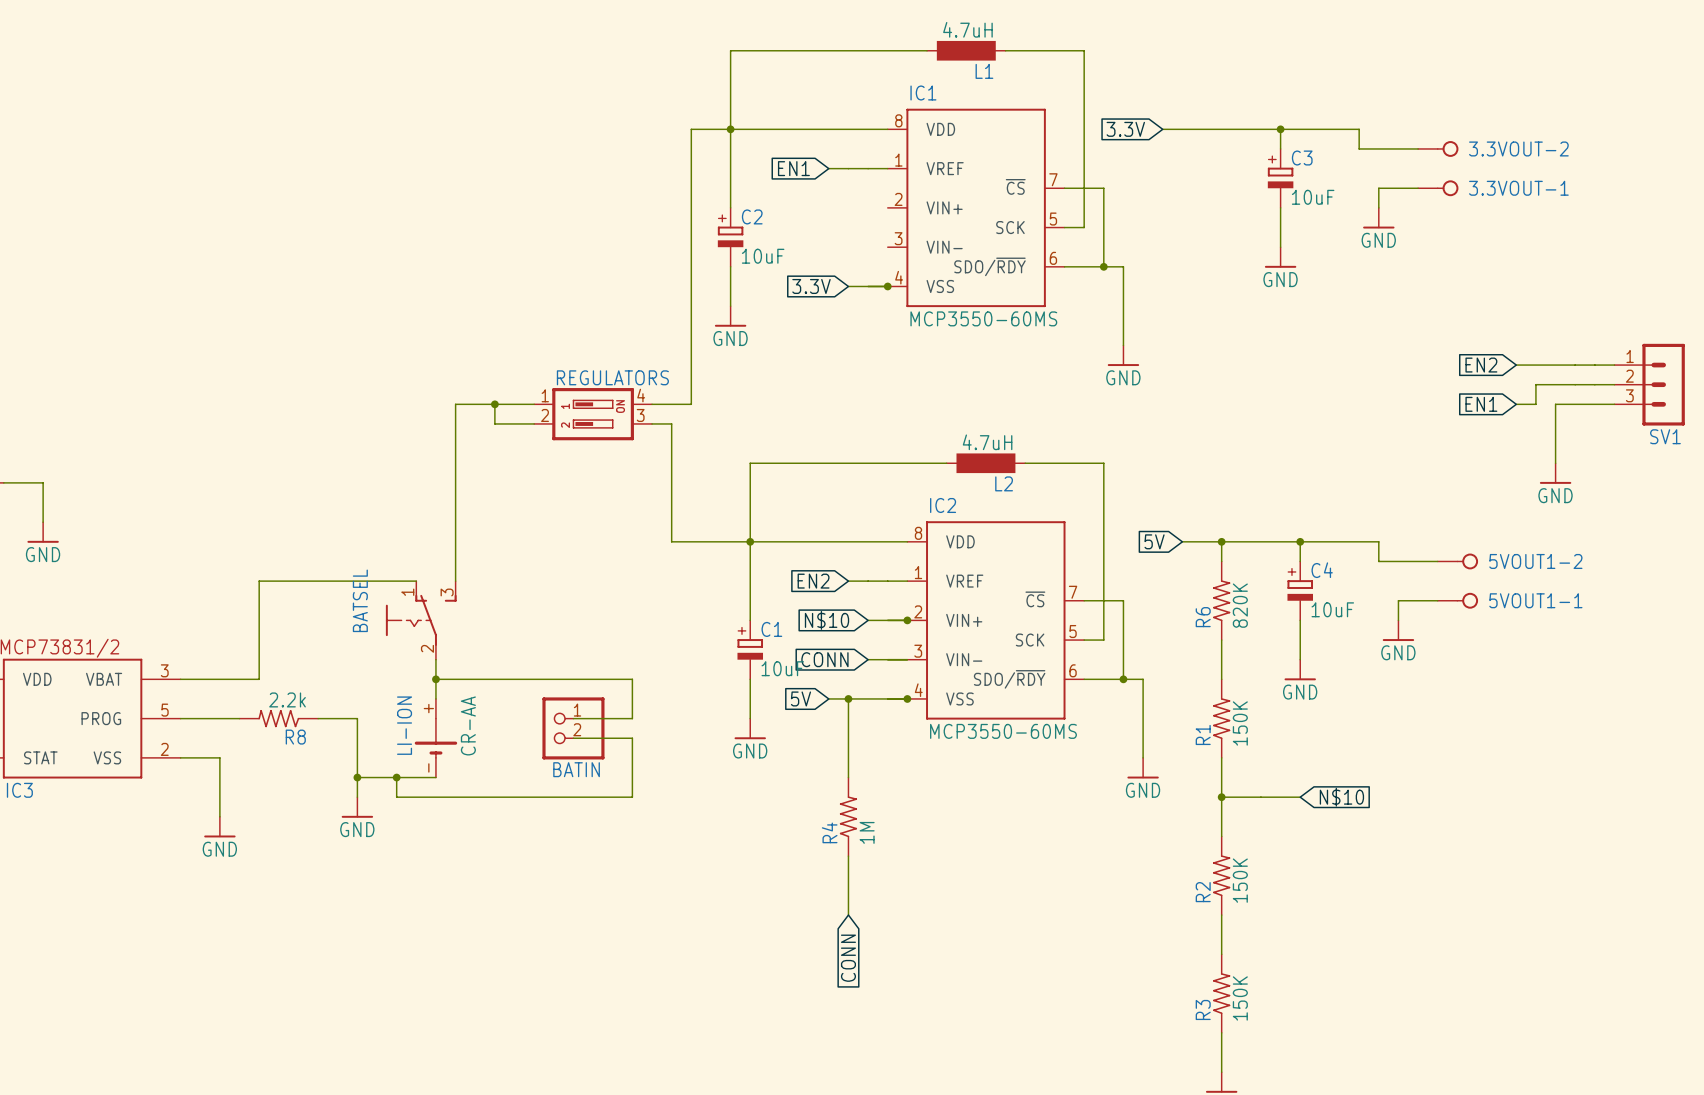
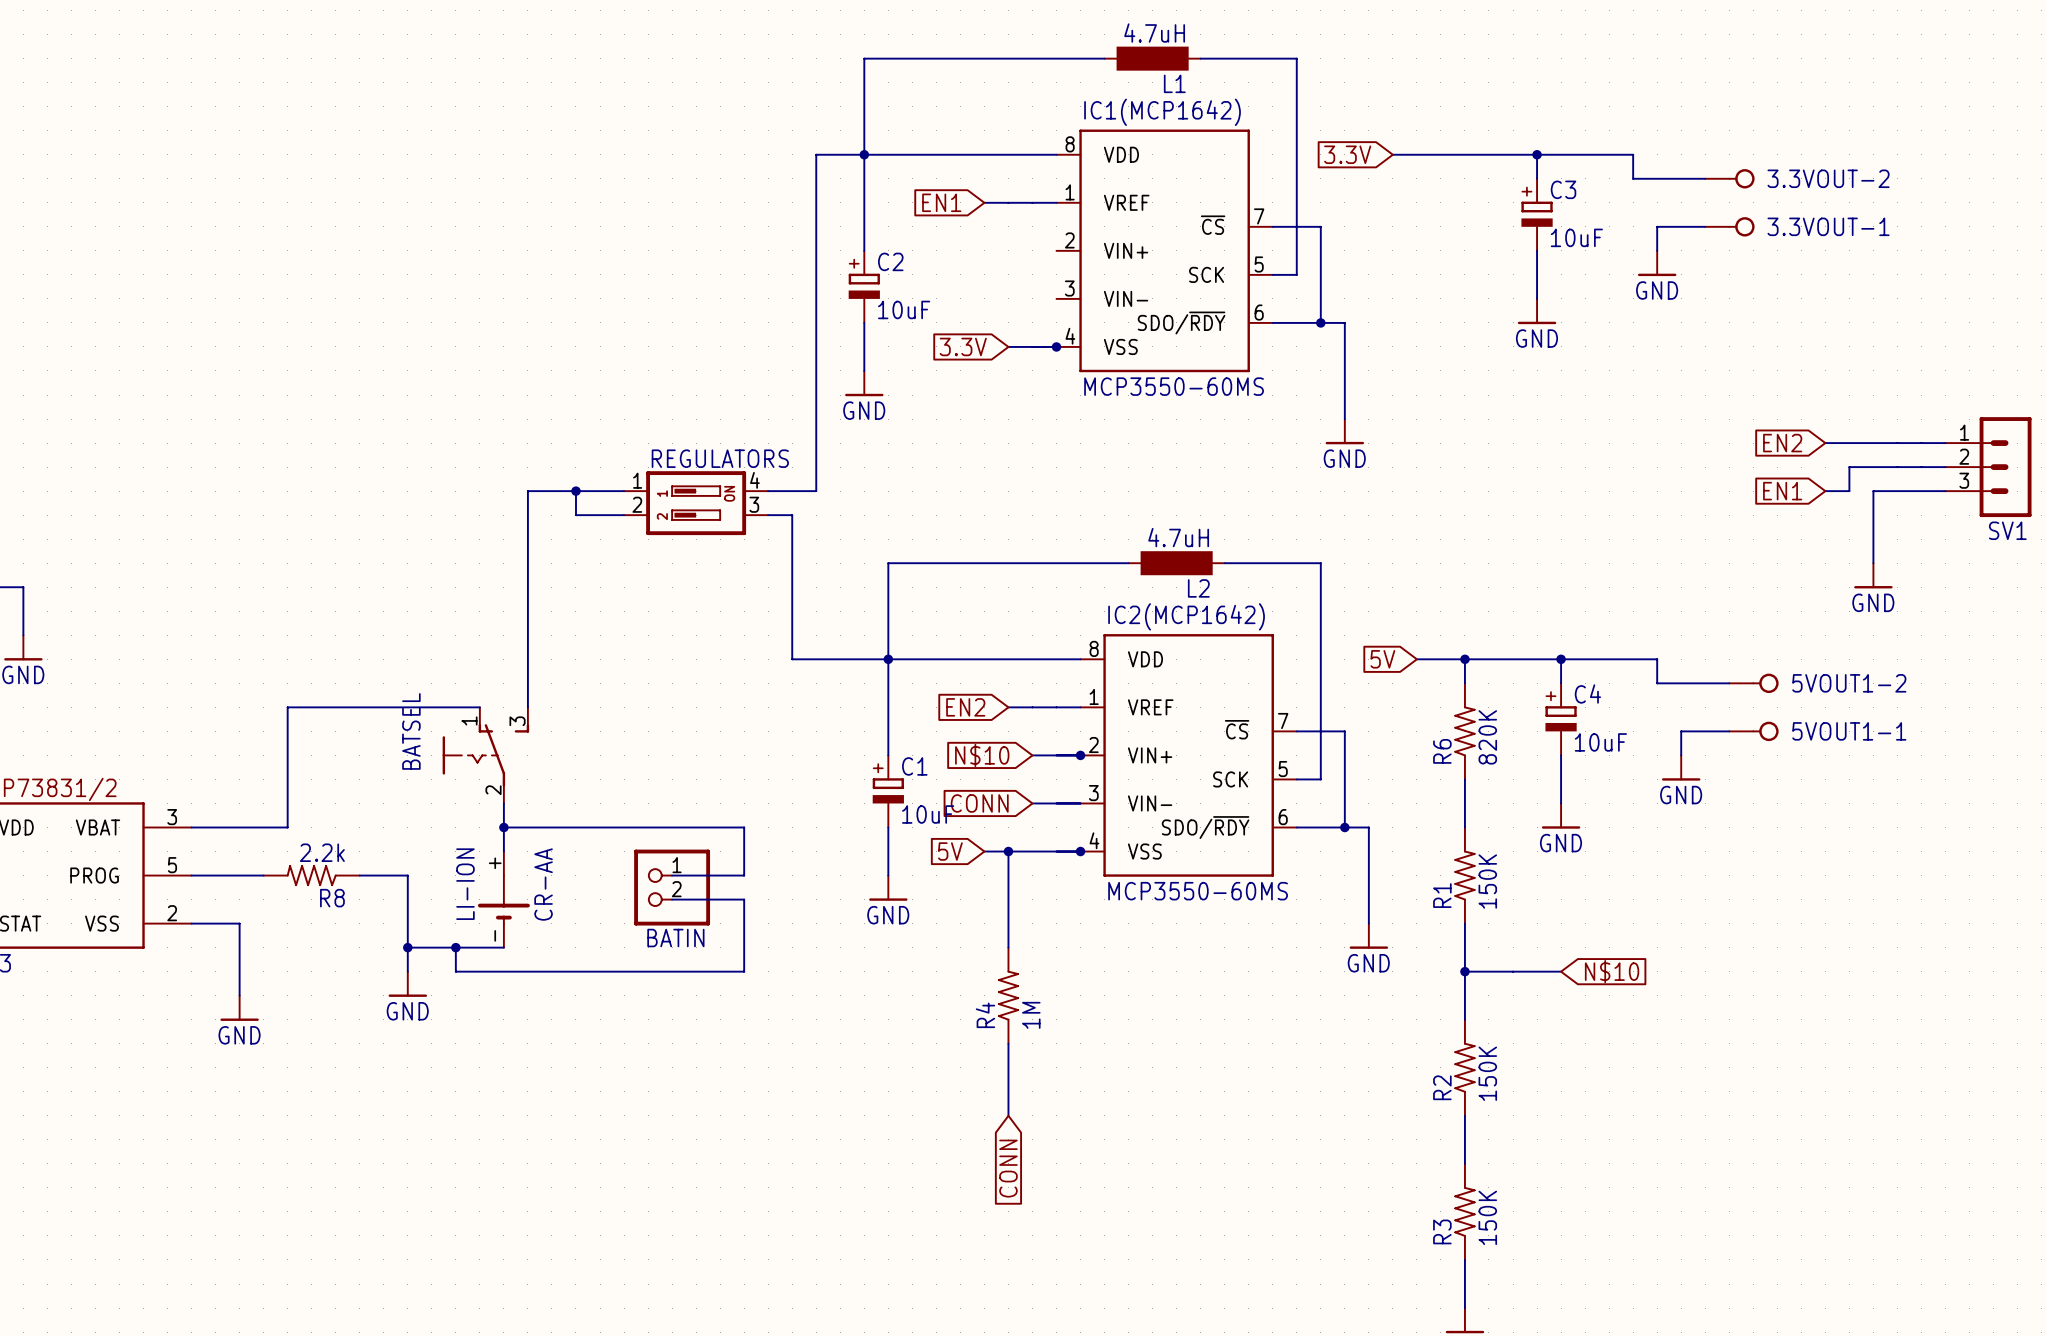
IC1 name: IC1 (923, 93) -> IC1(MCP1642) (1162, 112)
IC2 name: IC2 (943, 505) -> IC2(MCP1642) (1186, 616)

